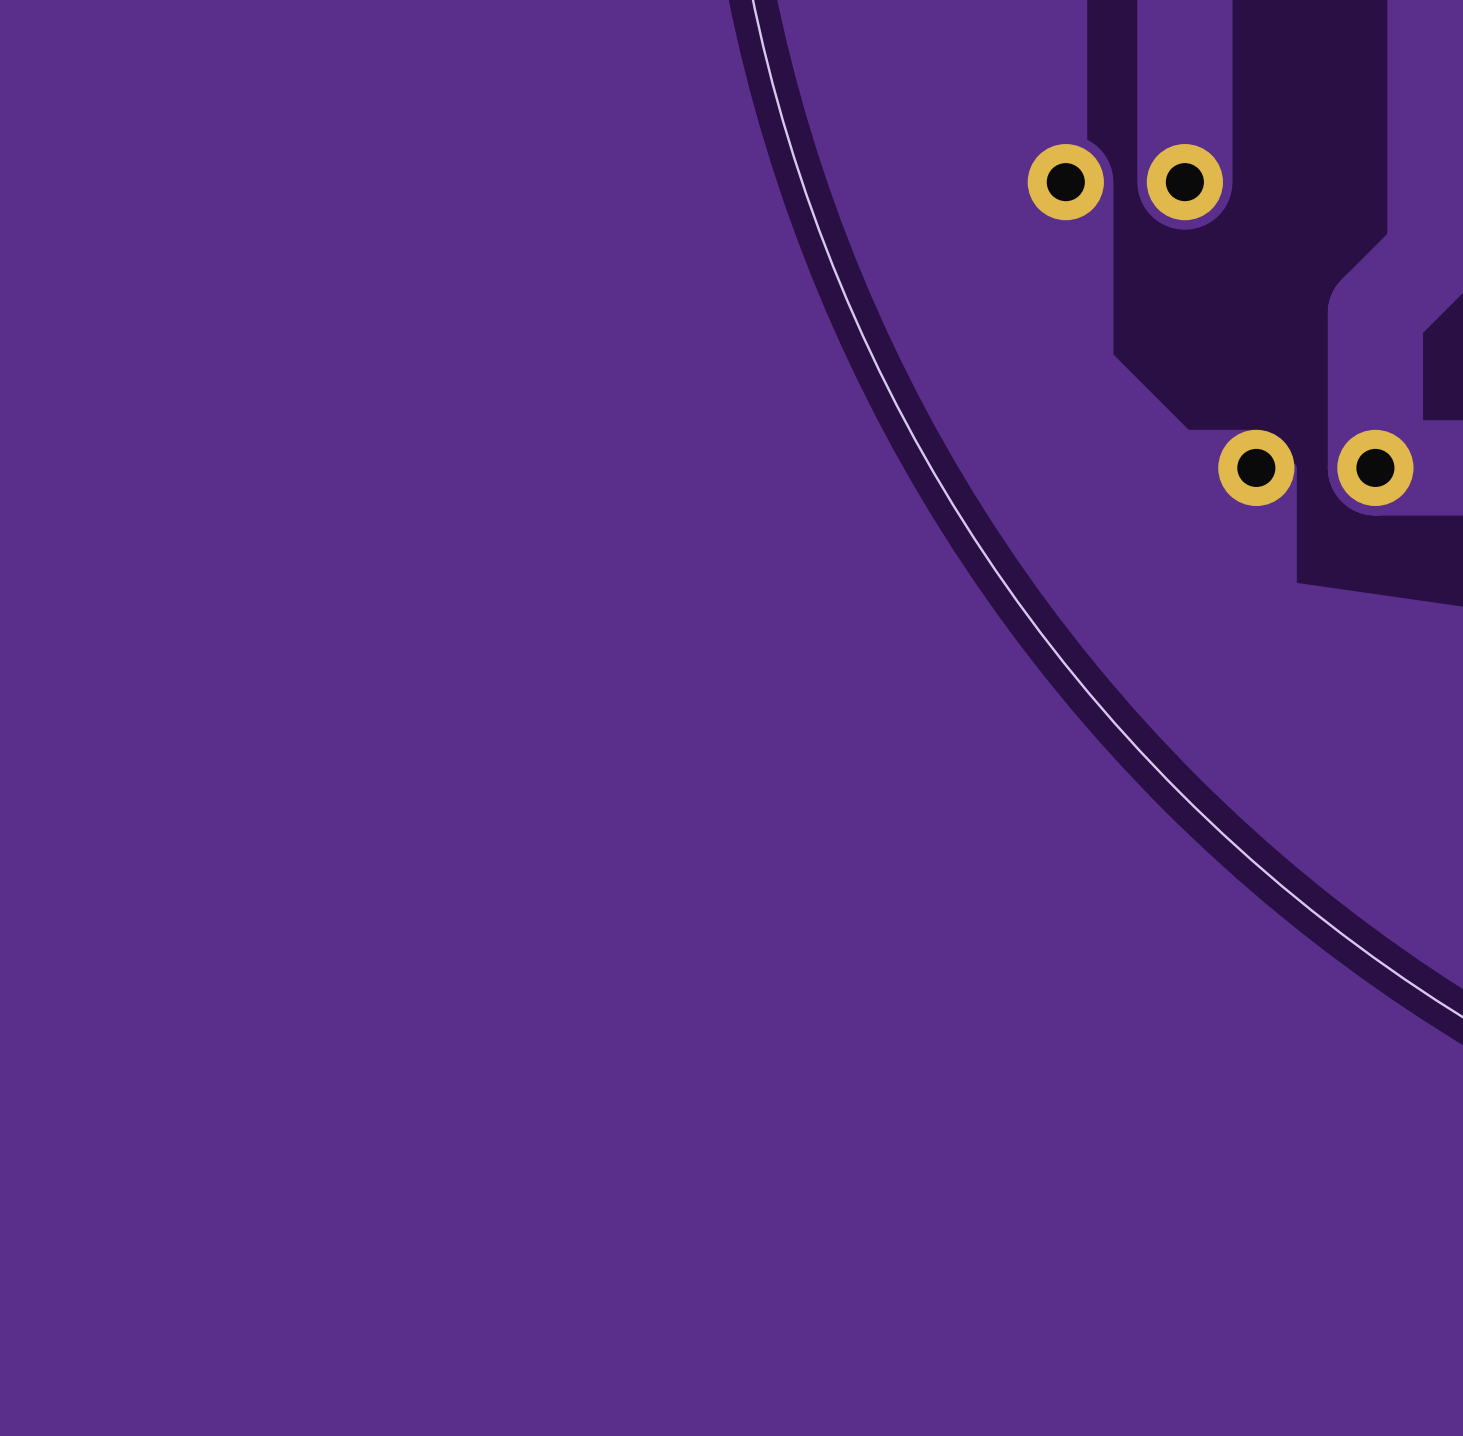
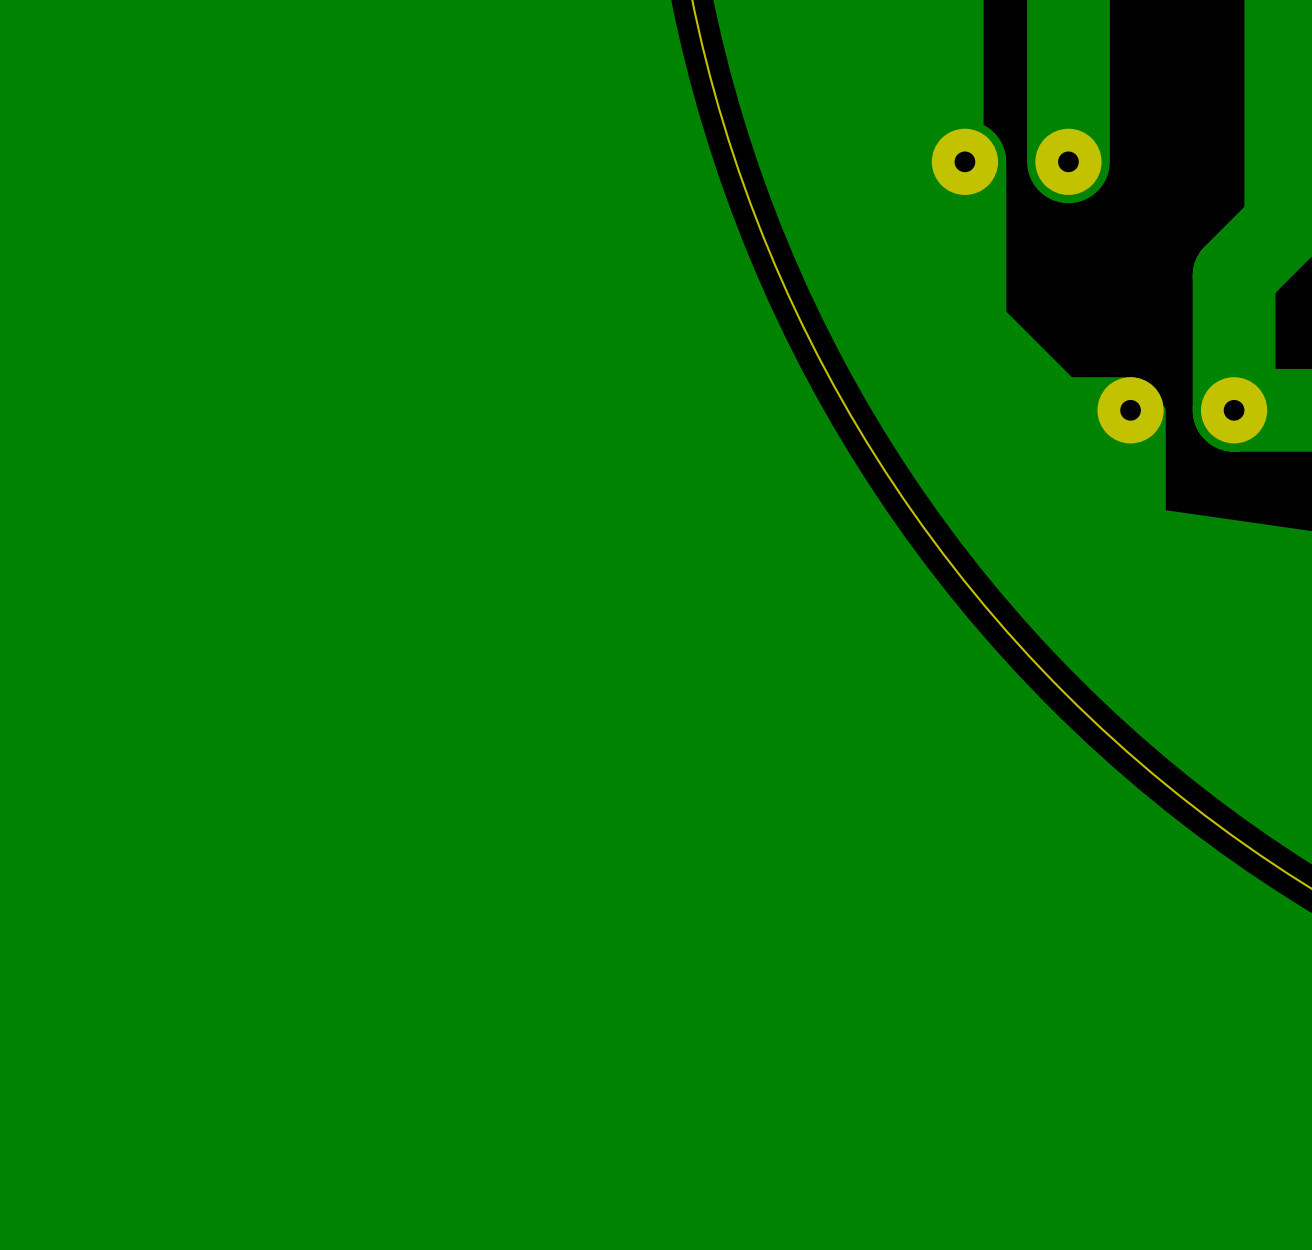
part footprint: [1027, 144, 1223, 221] -> [931, 128, 1102, 195]
part footprint: [1218, 429, 1414, 507] -> [1097, 377, 1268, 444]

